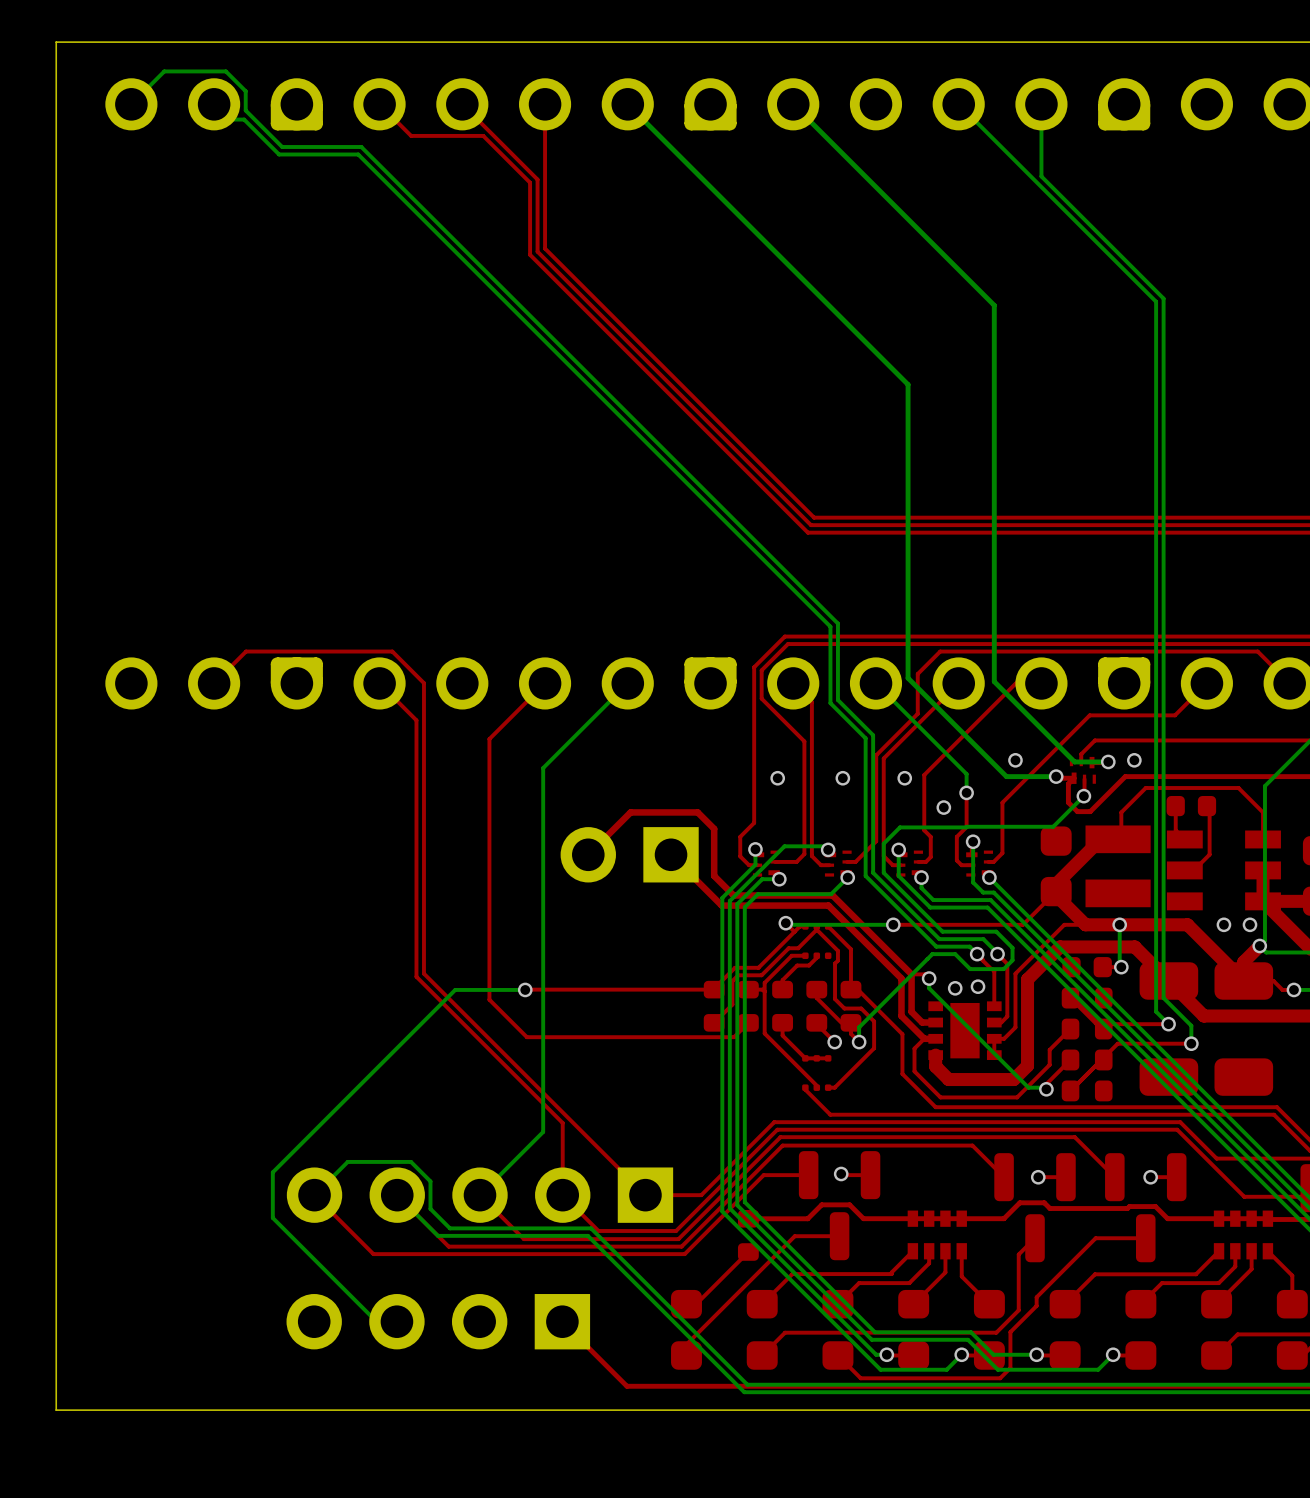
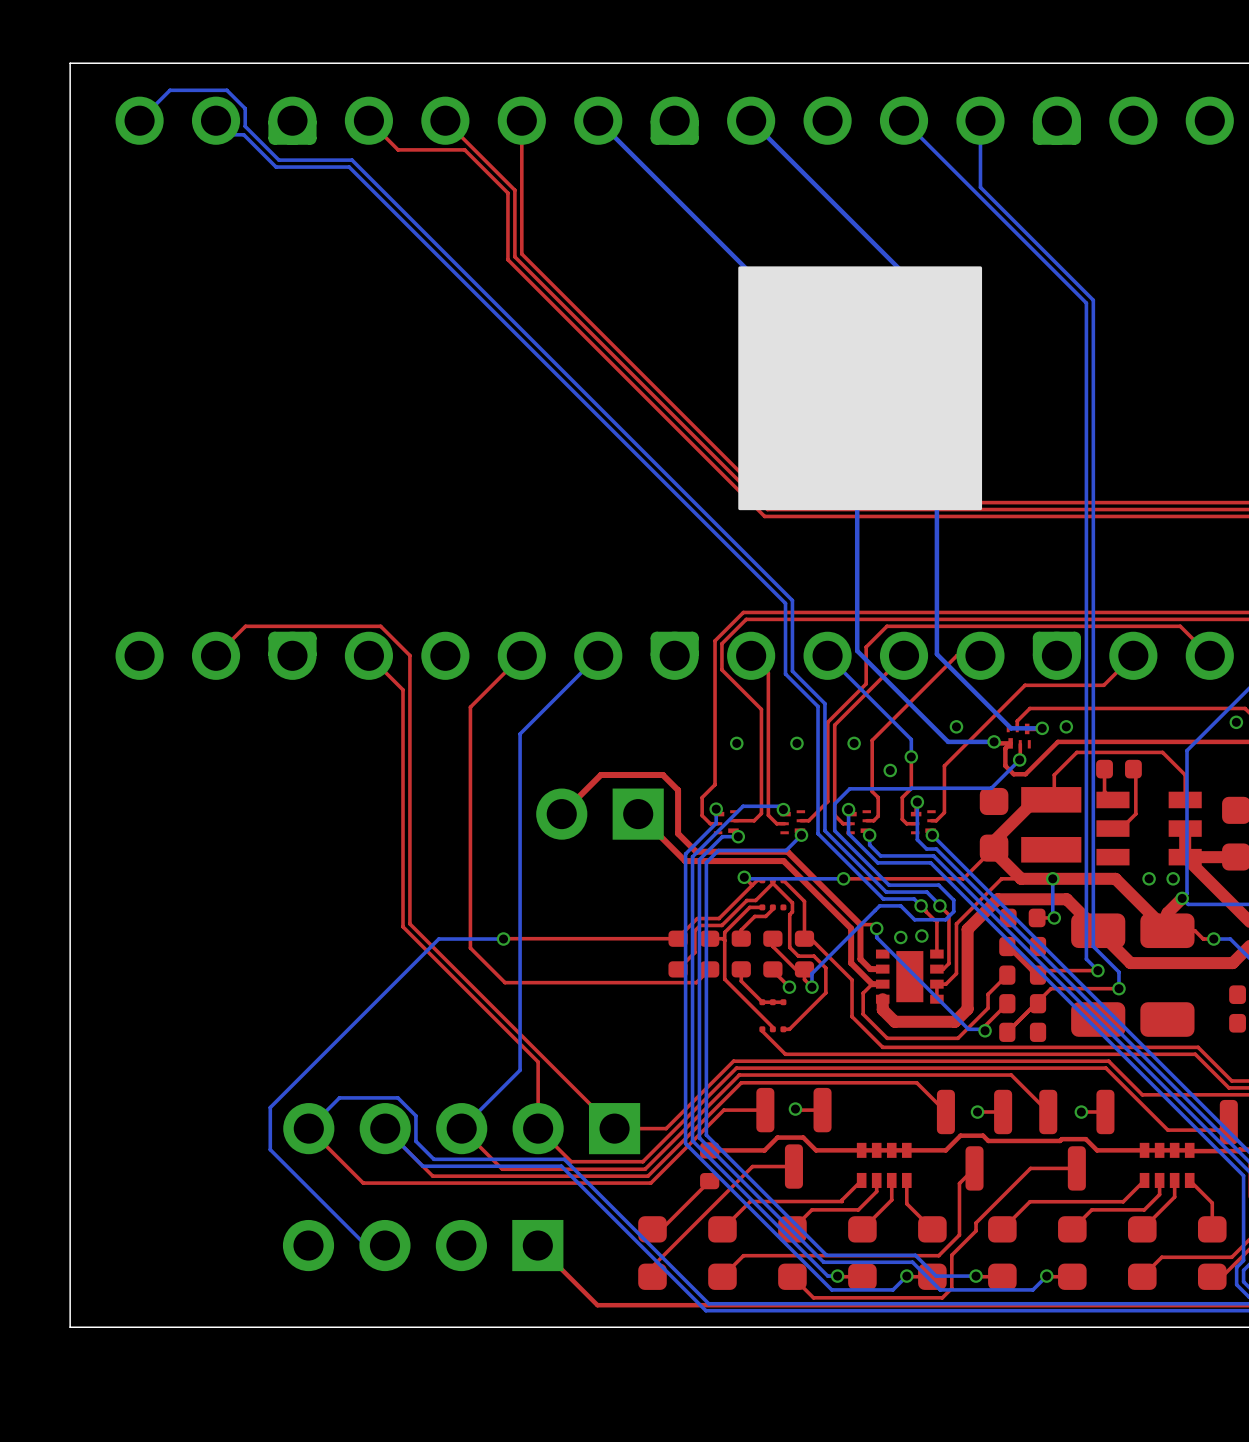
drawing: none -> [738, 266, 983, 511]

